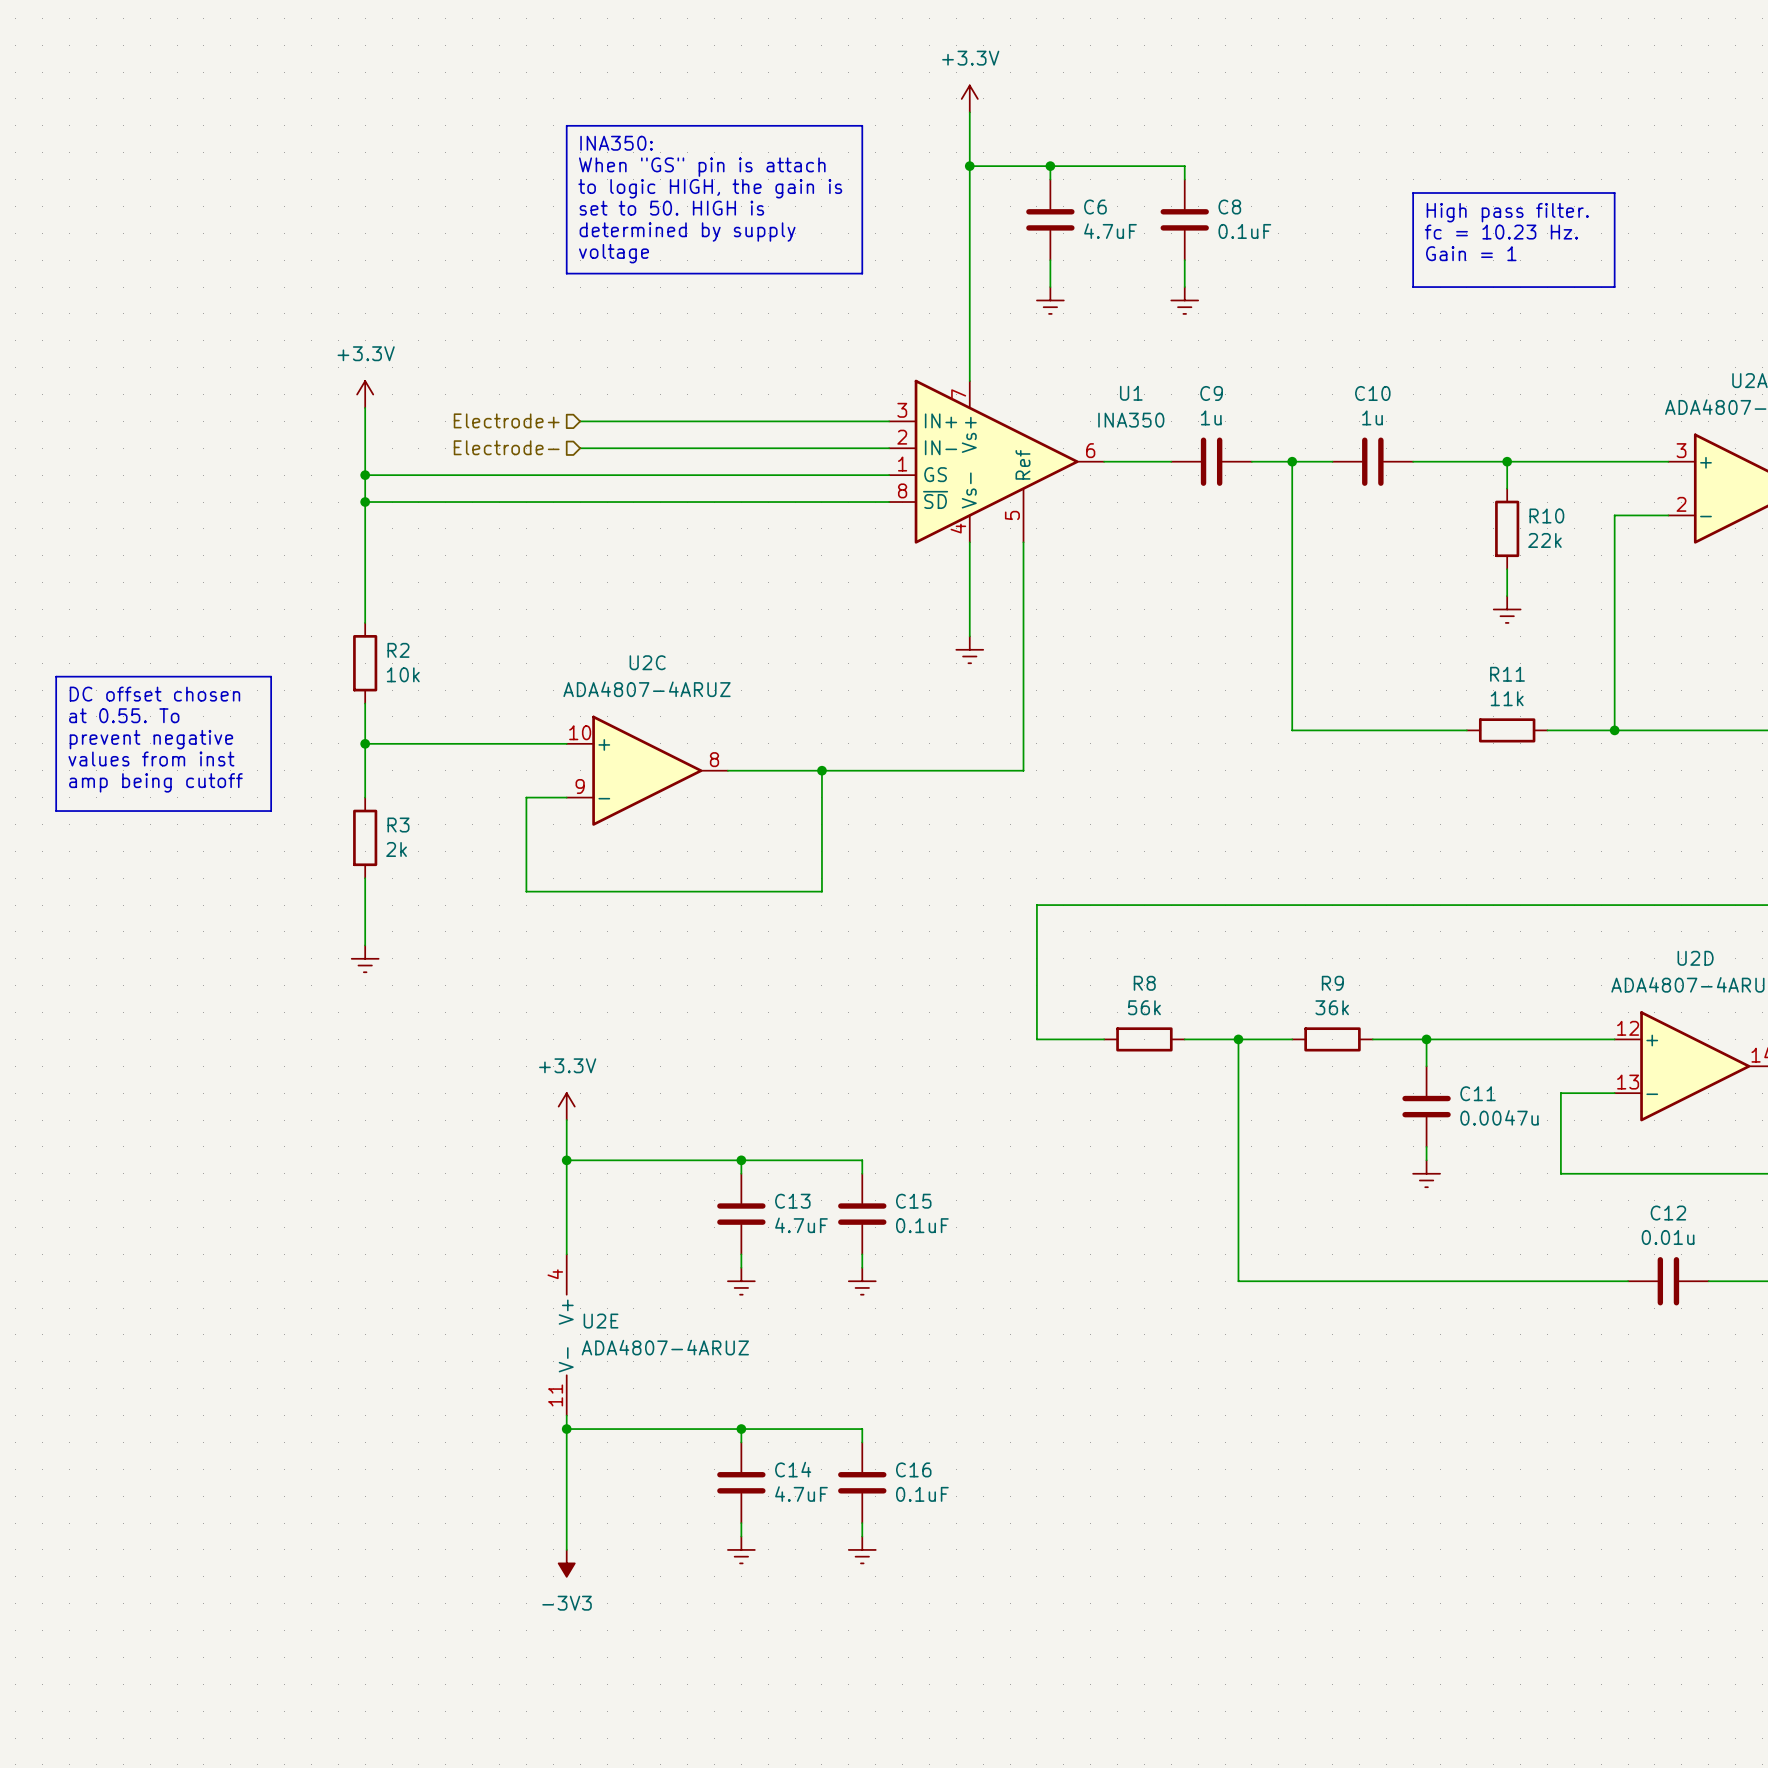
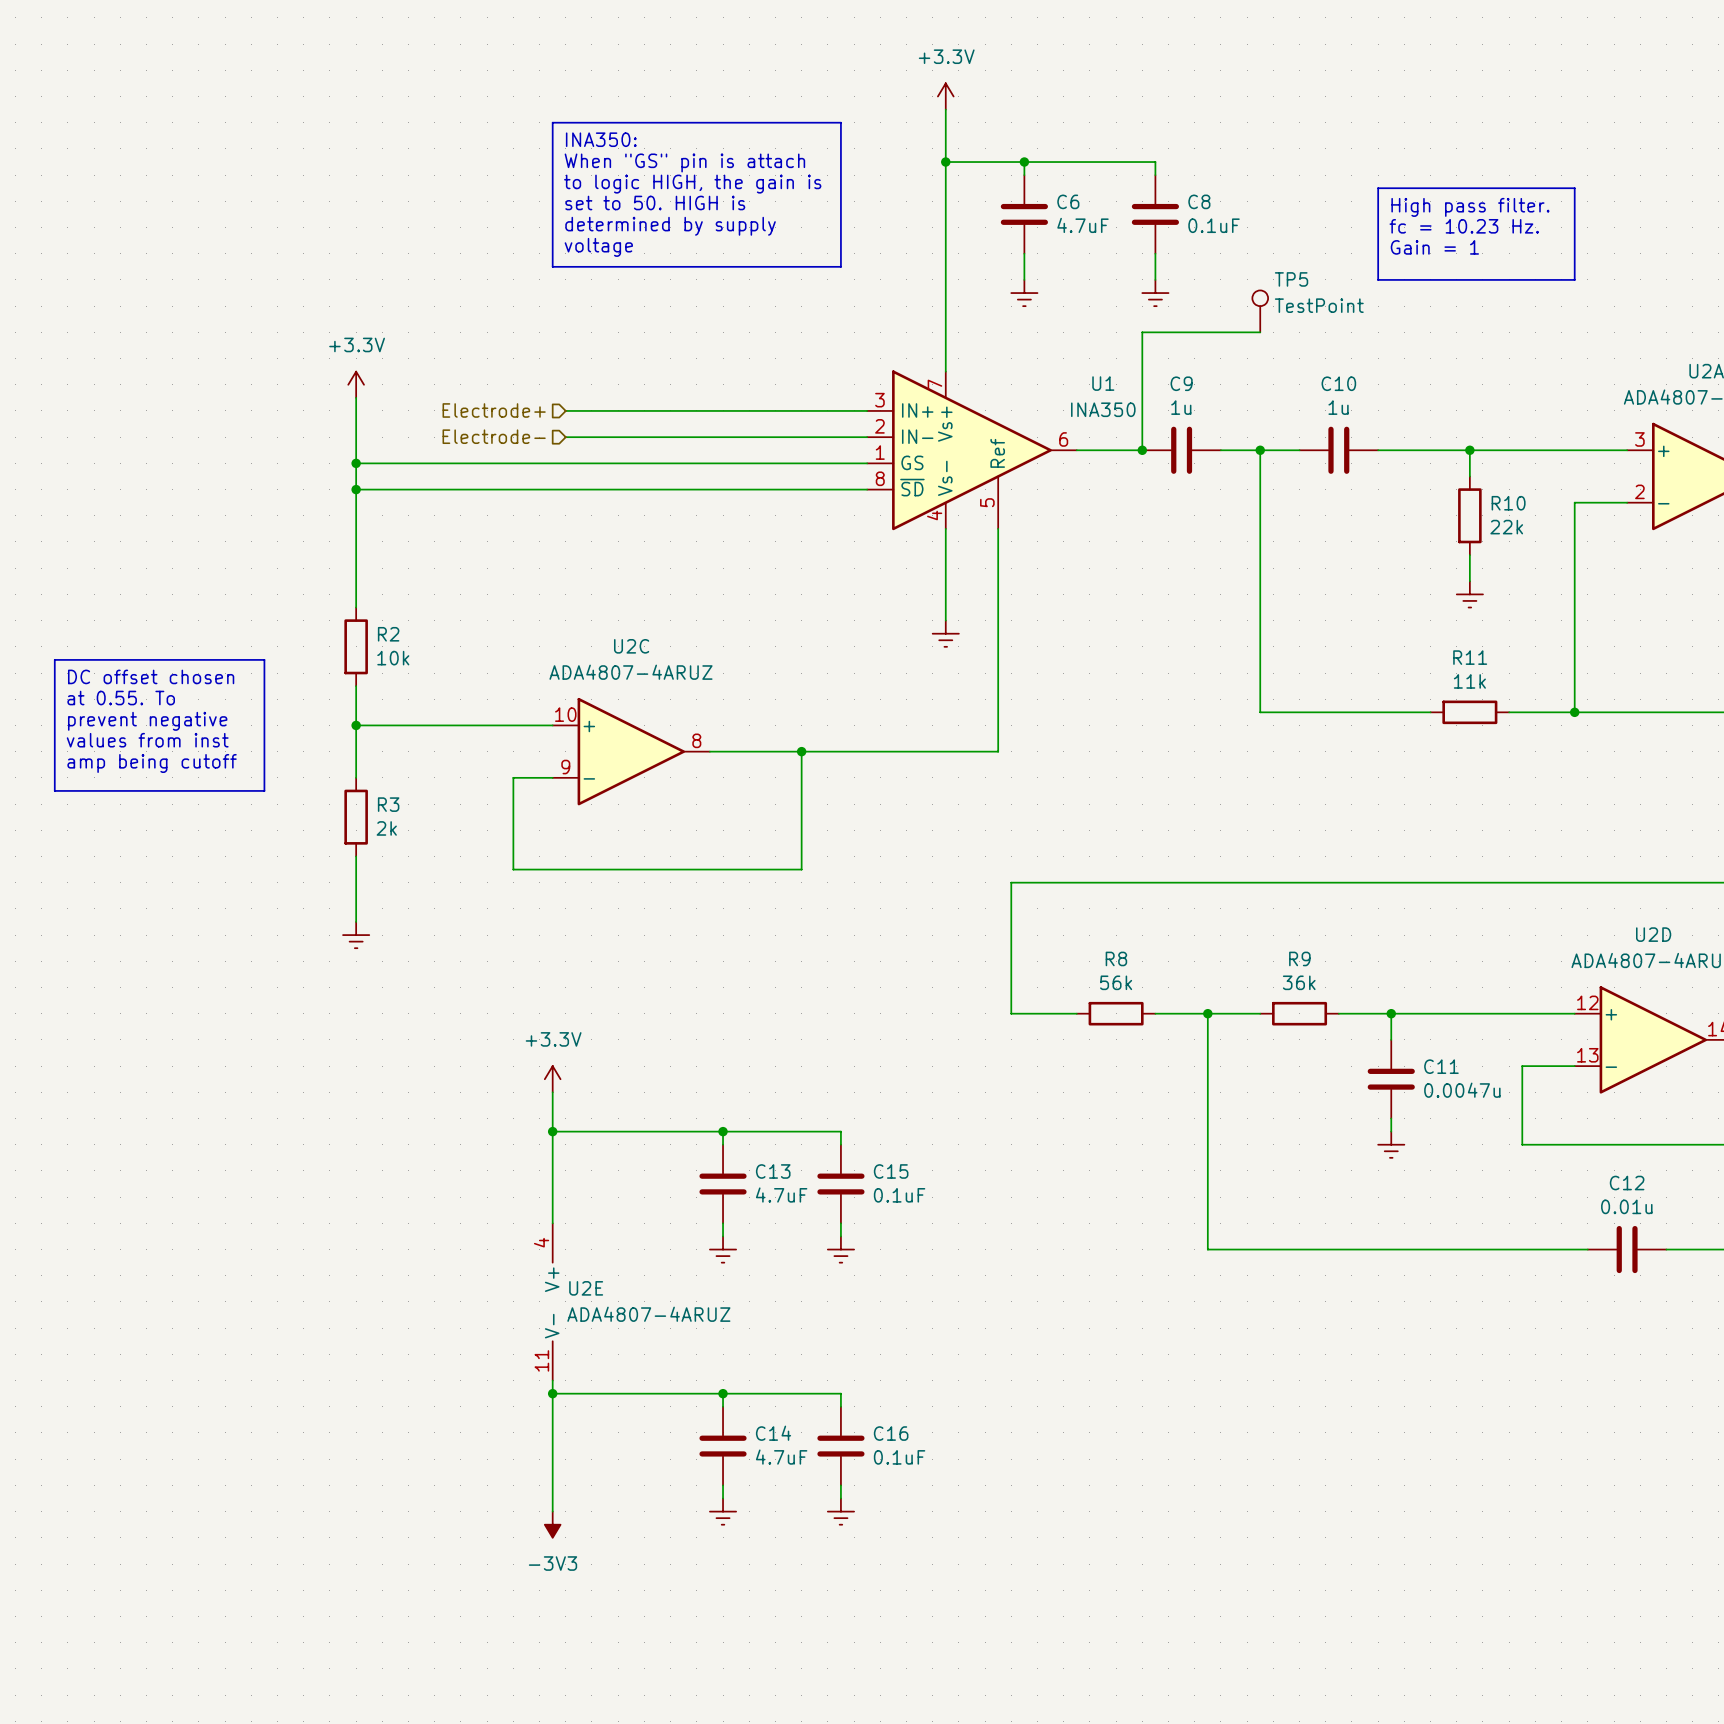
TP5: none -> TestPoint (1260, 311)
wire: none -> (1260, 332) (1142, 332) (1142, 450)
junction: none -> (1142, 450)

